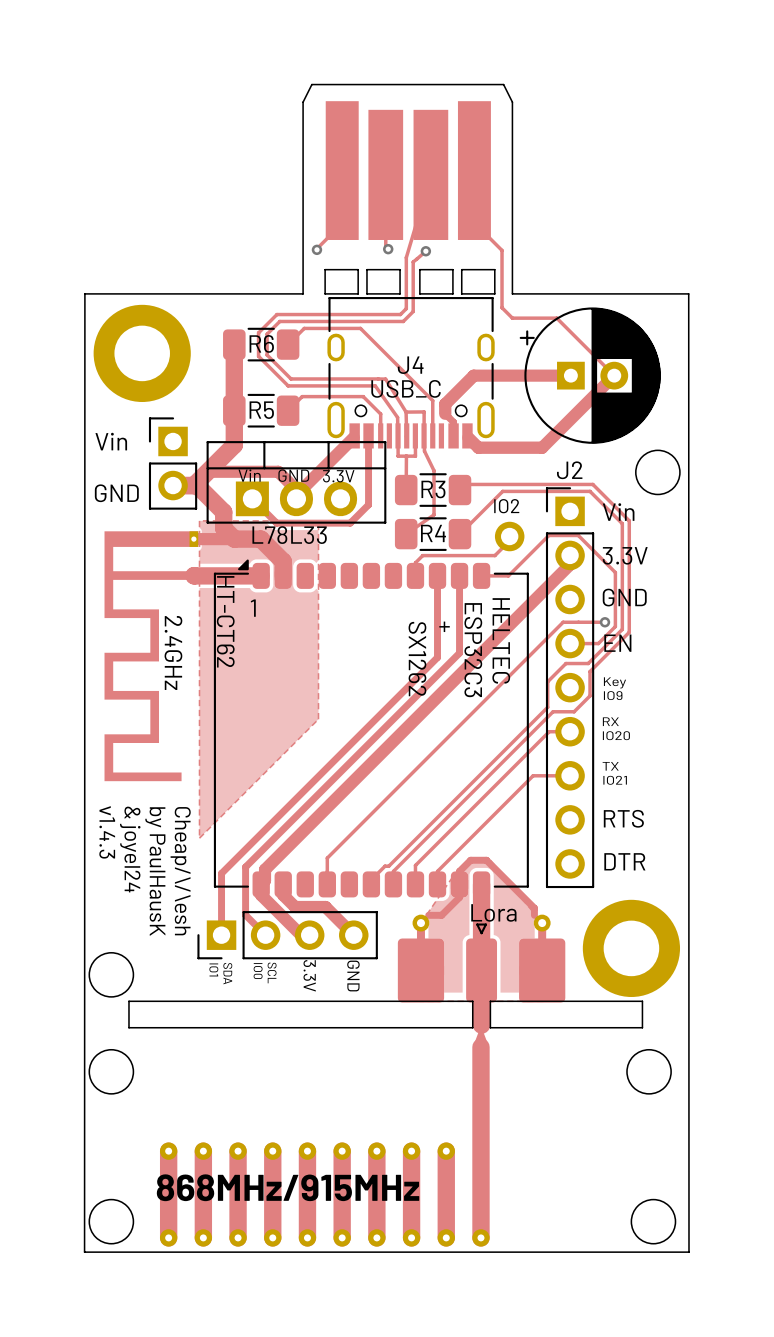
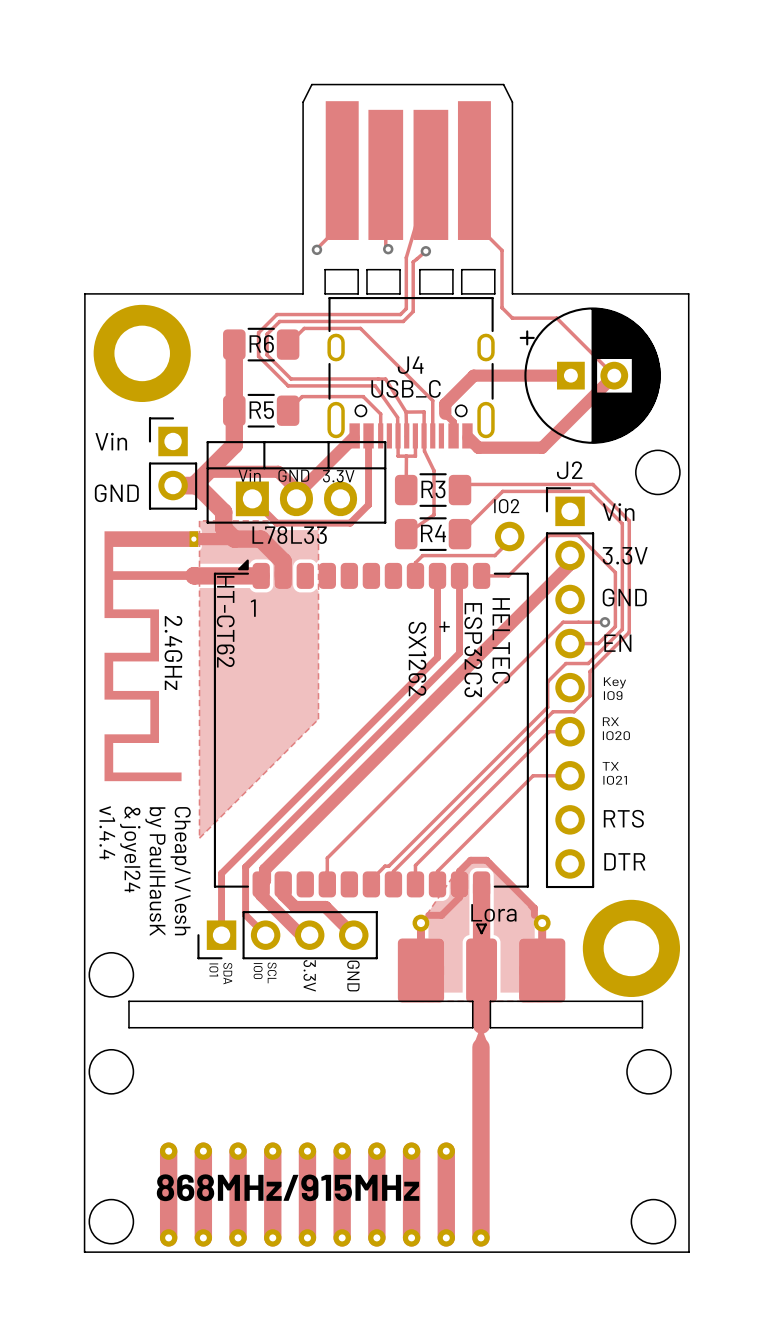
text: v1.4.3 (107, 832) -> v1.4.4 (107, 832)

